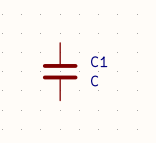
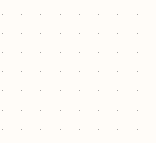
C1: C (60, 71) -> none

